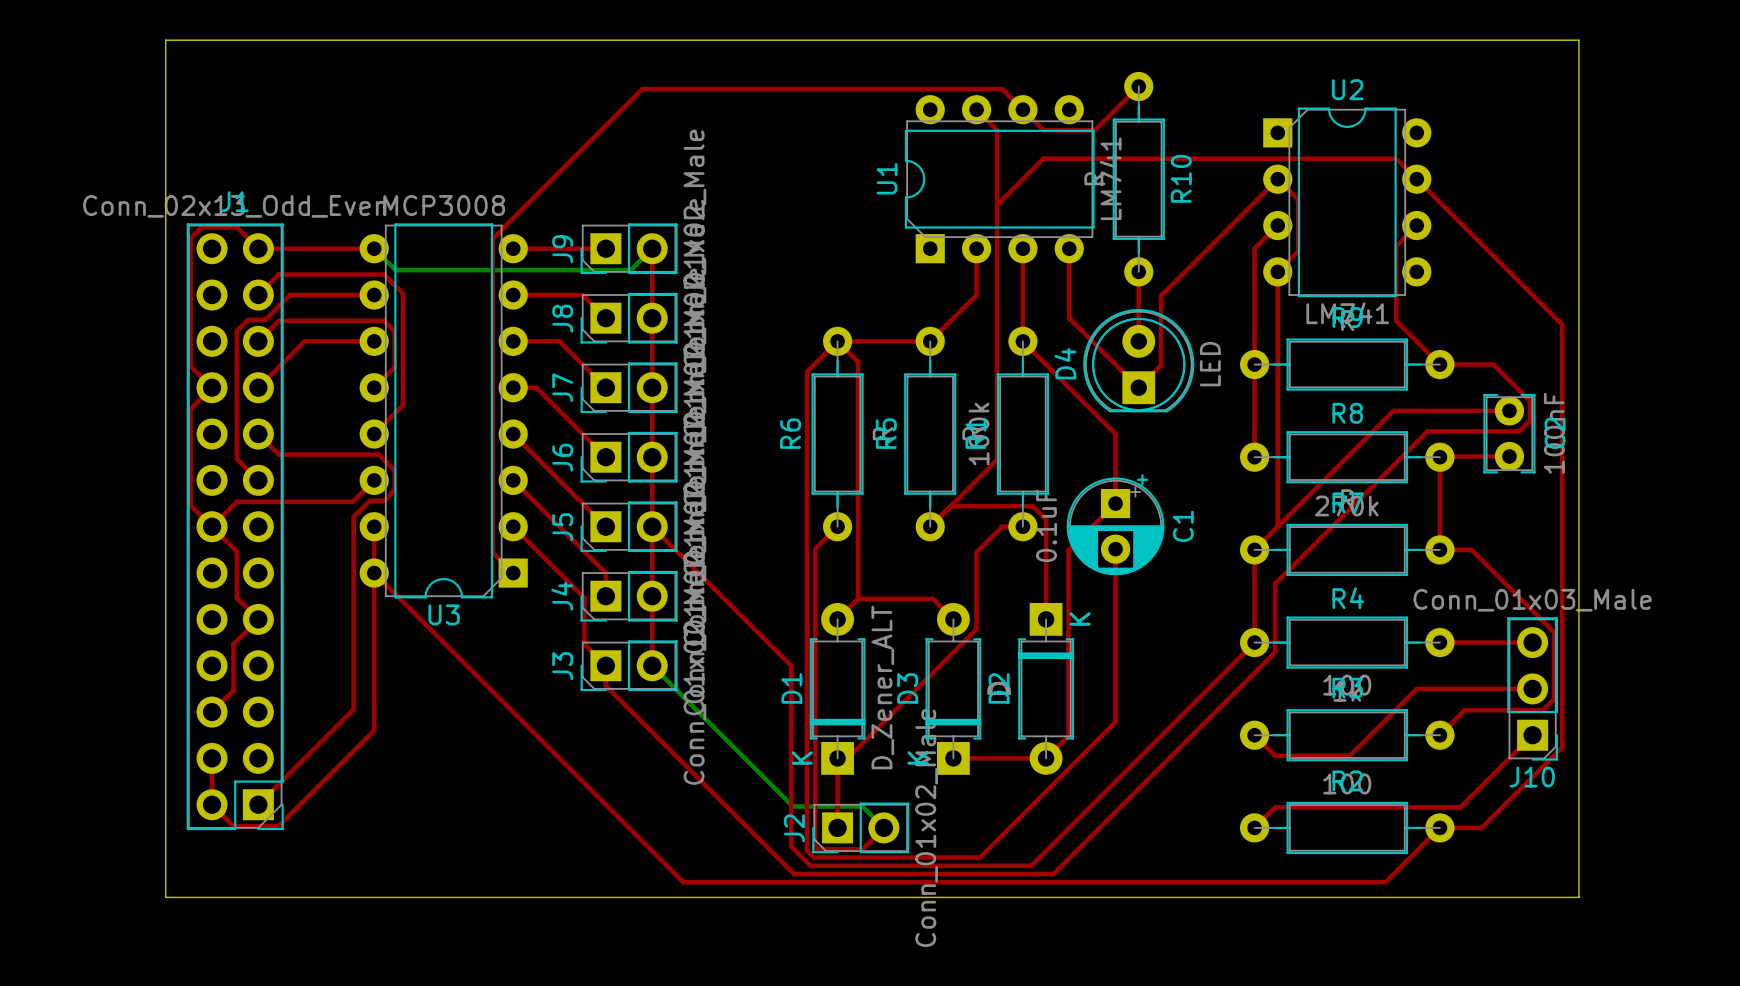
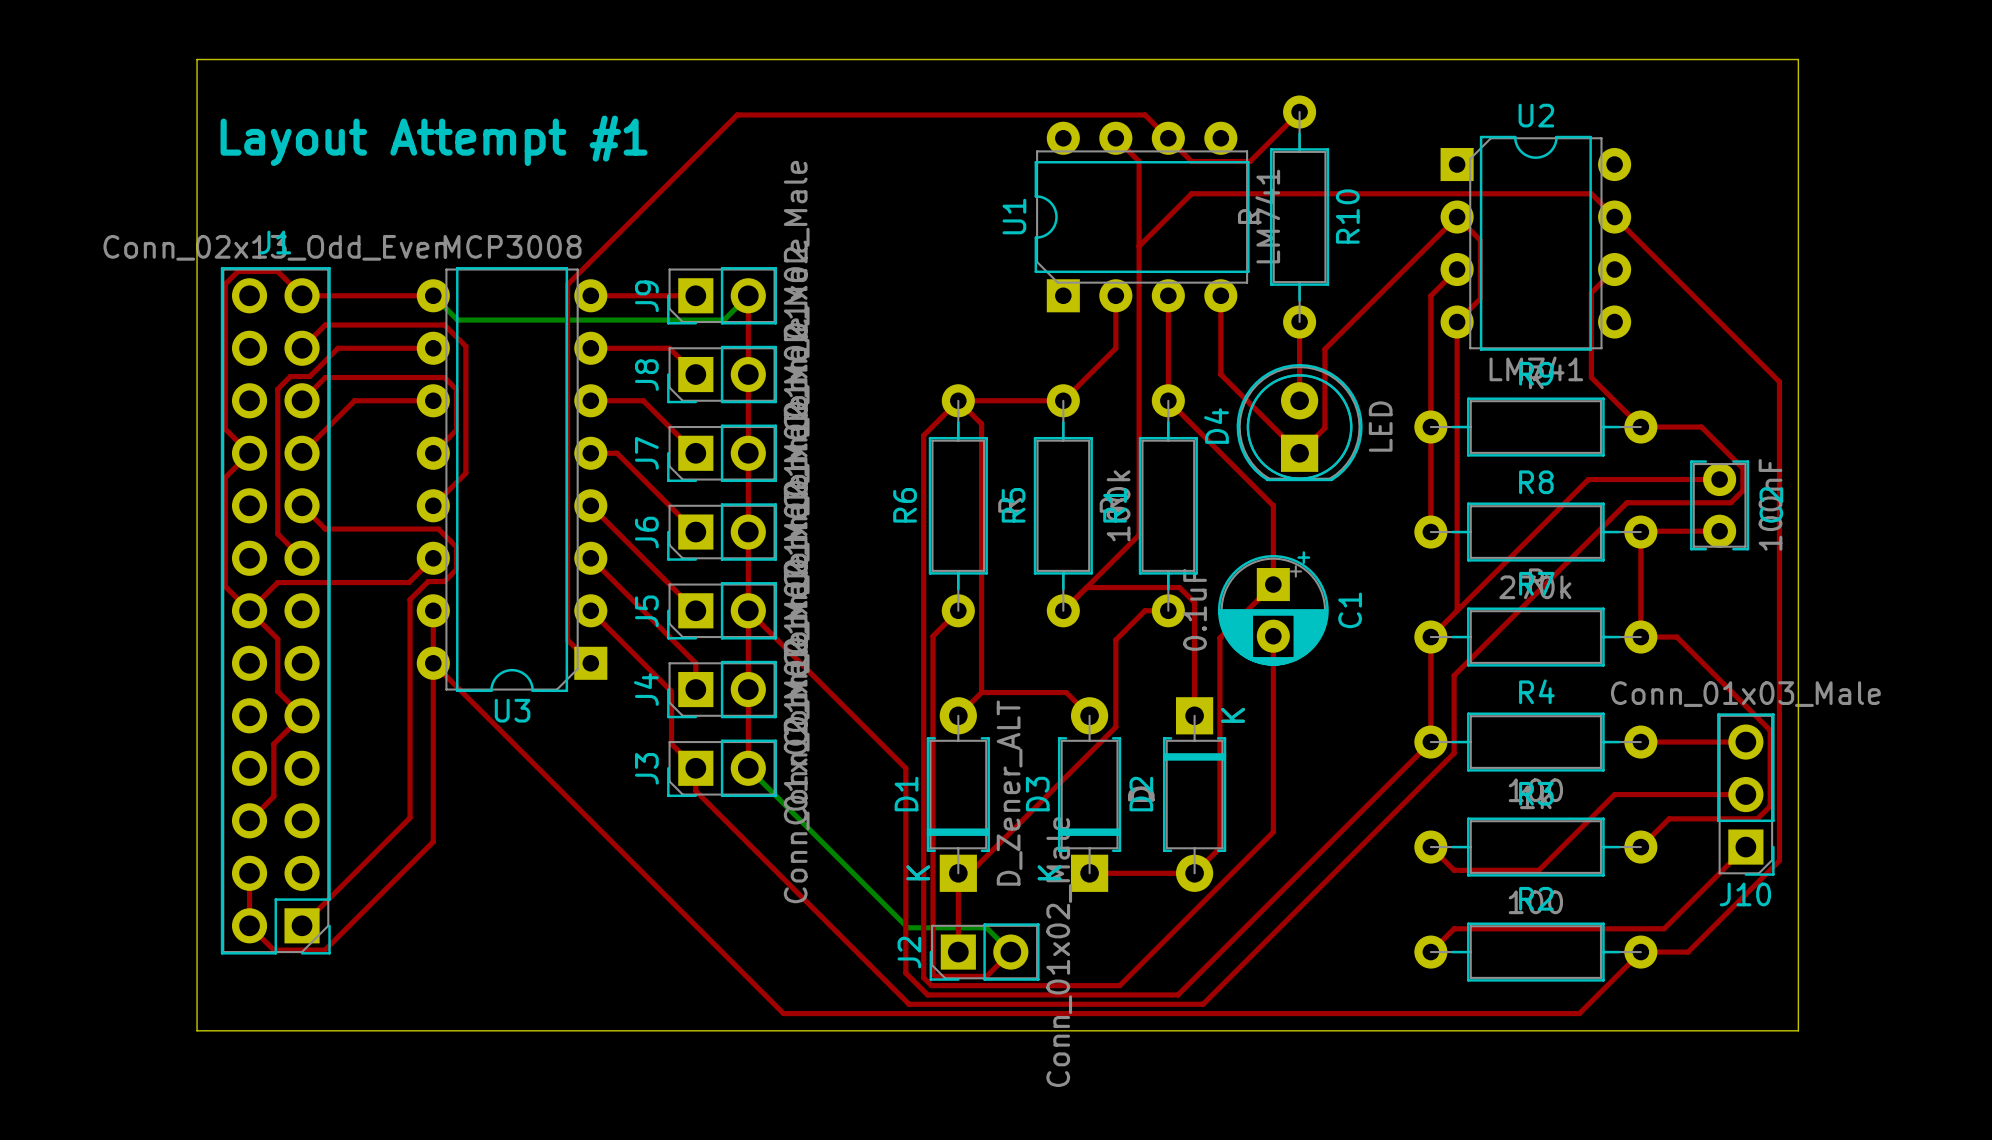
text: none -> Layout Attempt #1 (434, 140)

